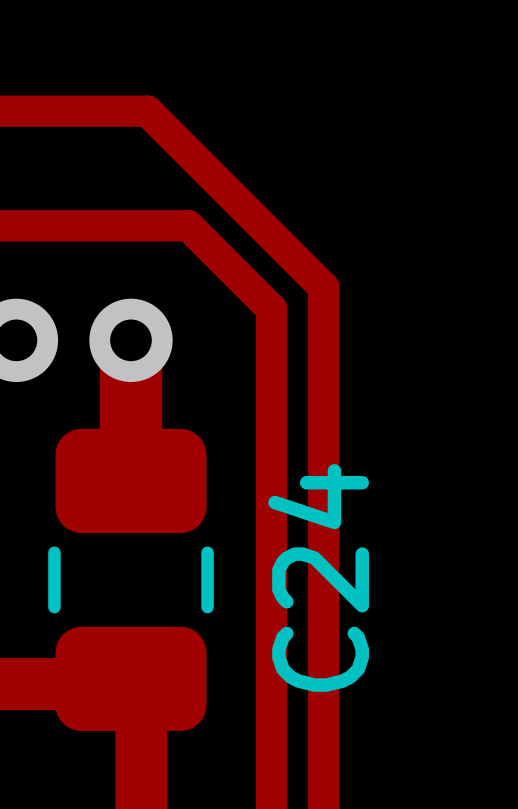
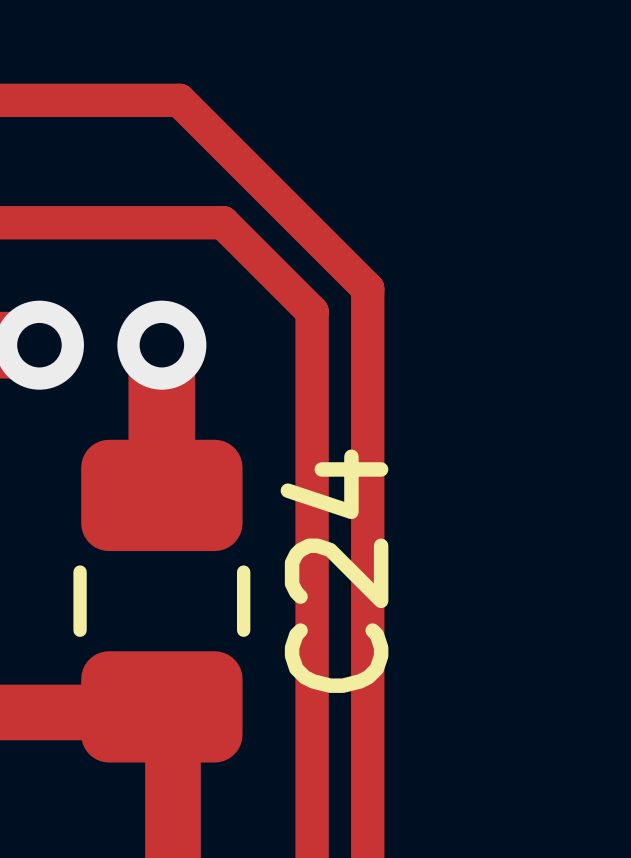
C24 name position: C24 (318, 577) -> C24 (334, 571)

